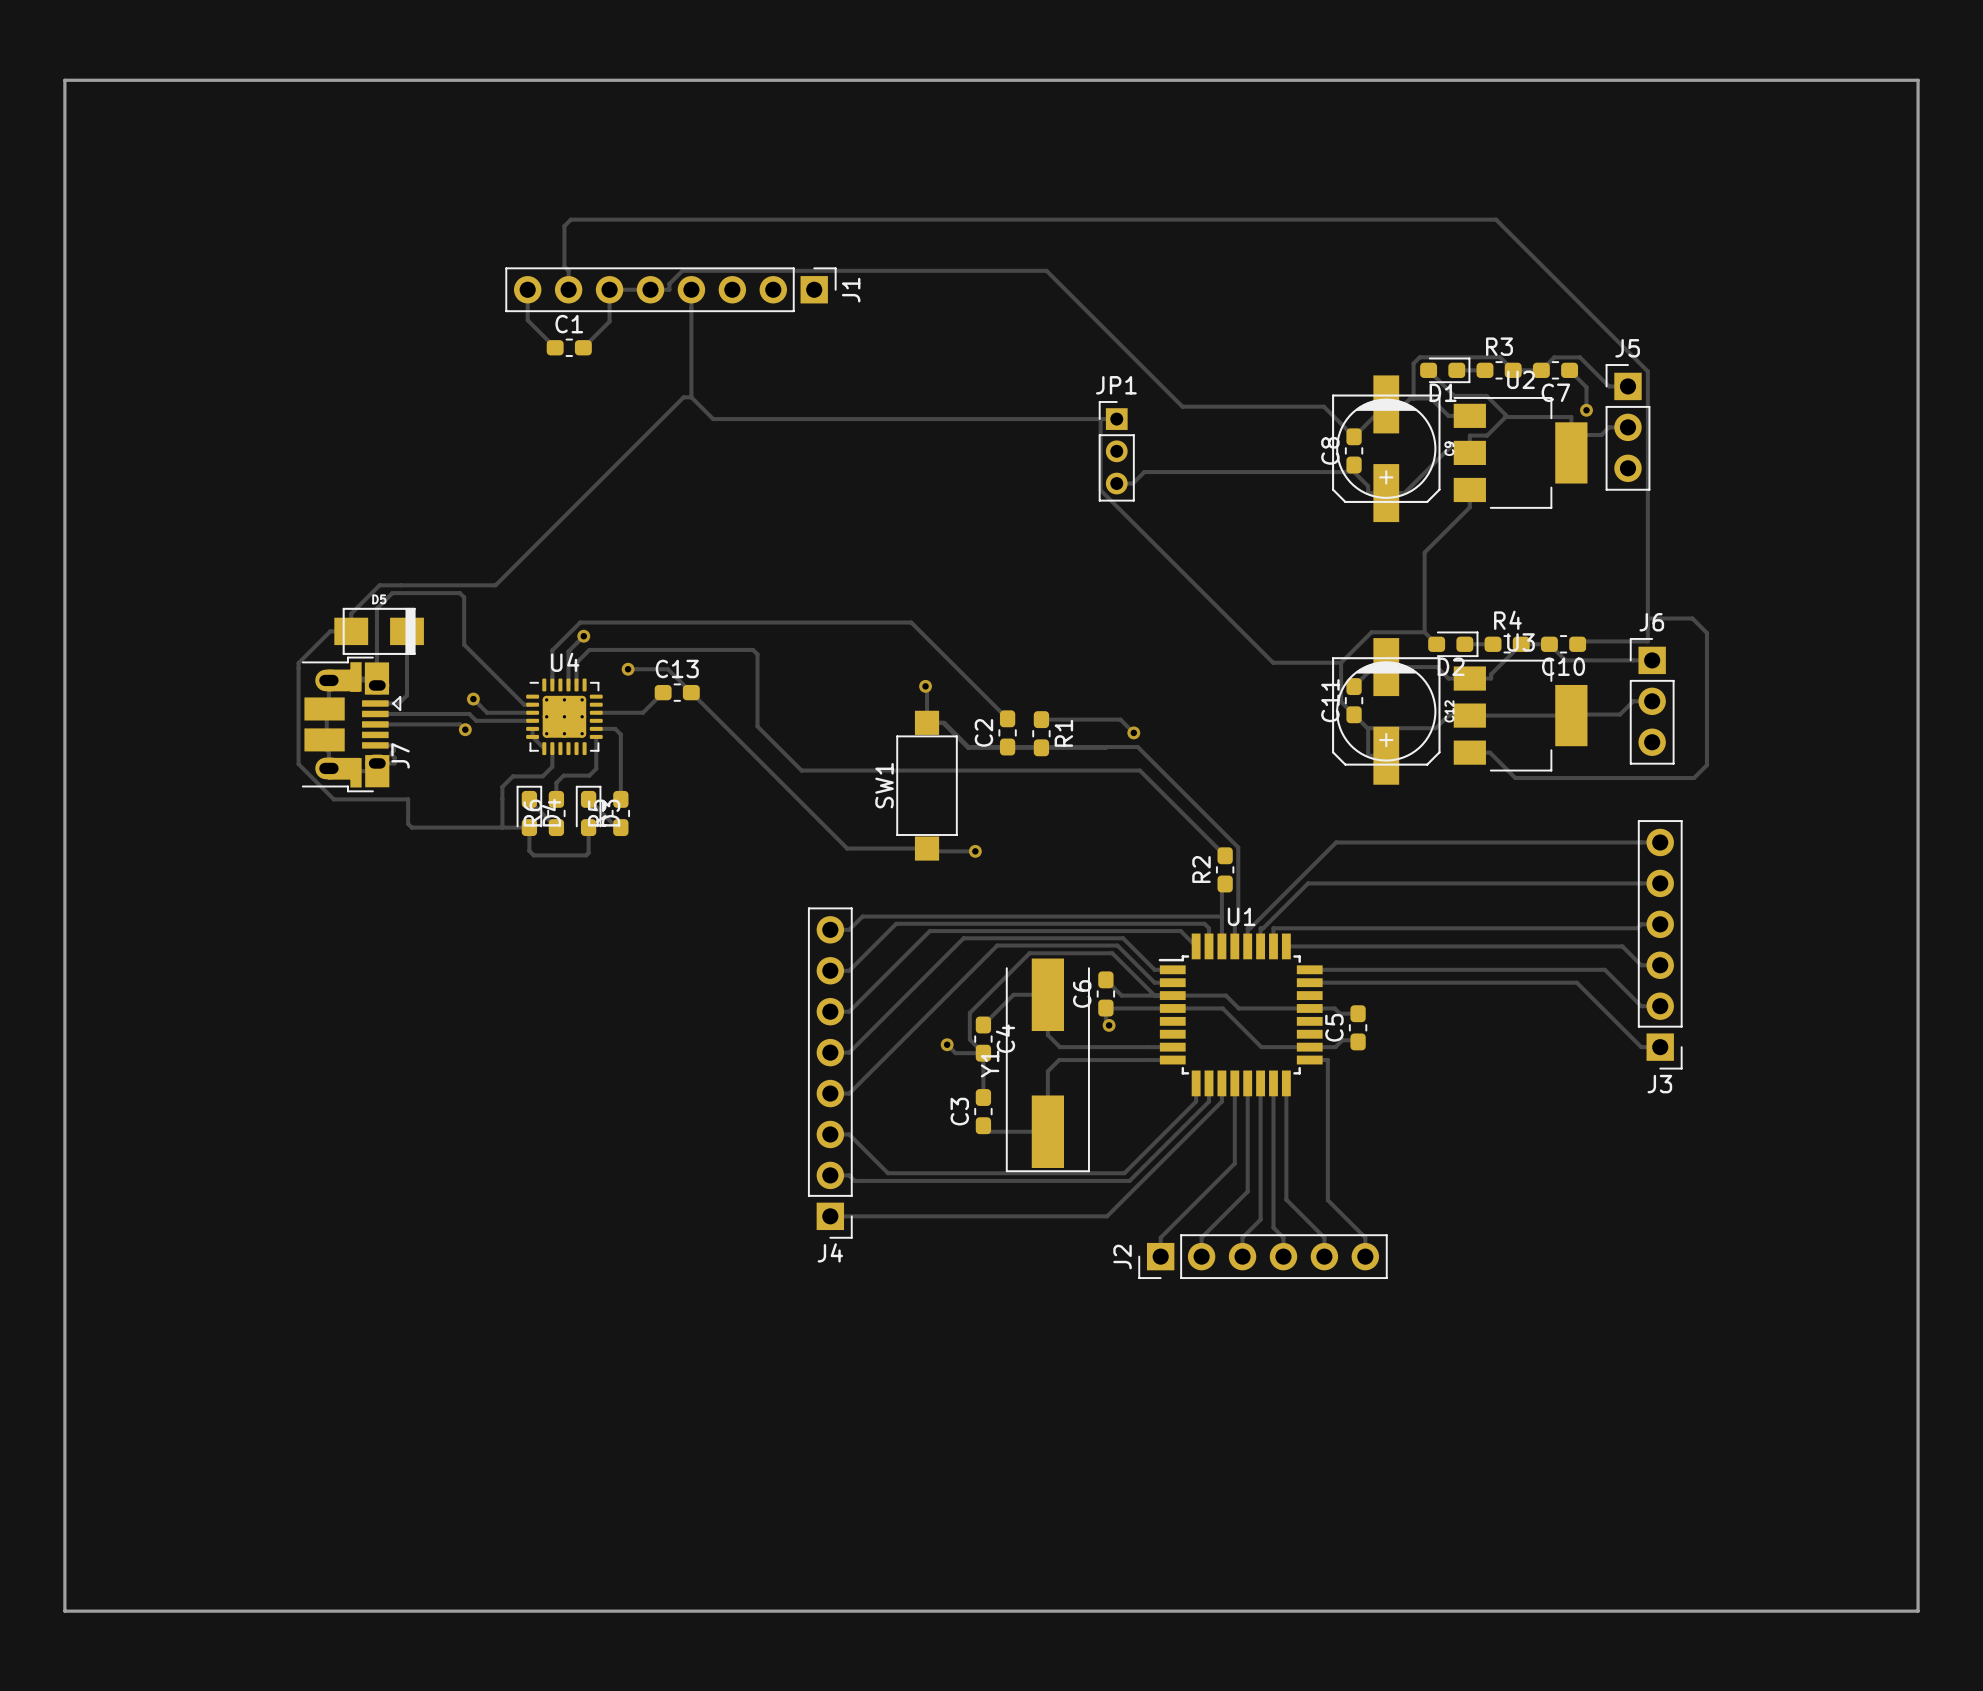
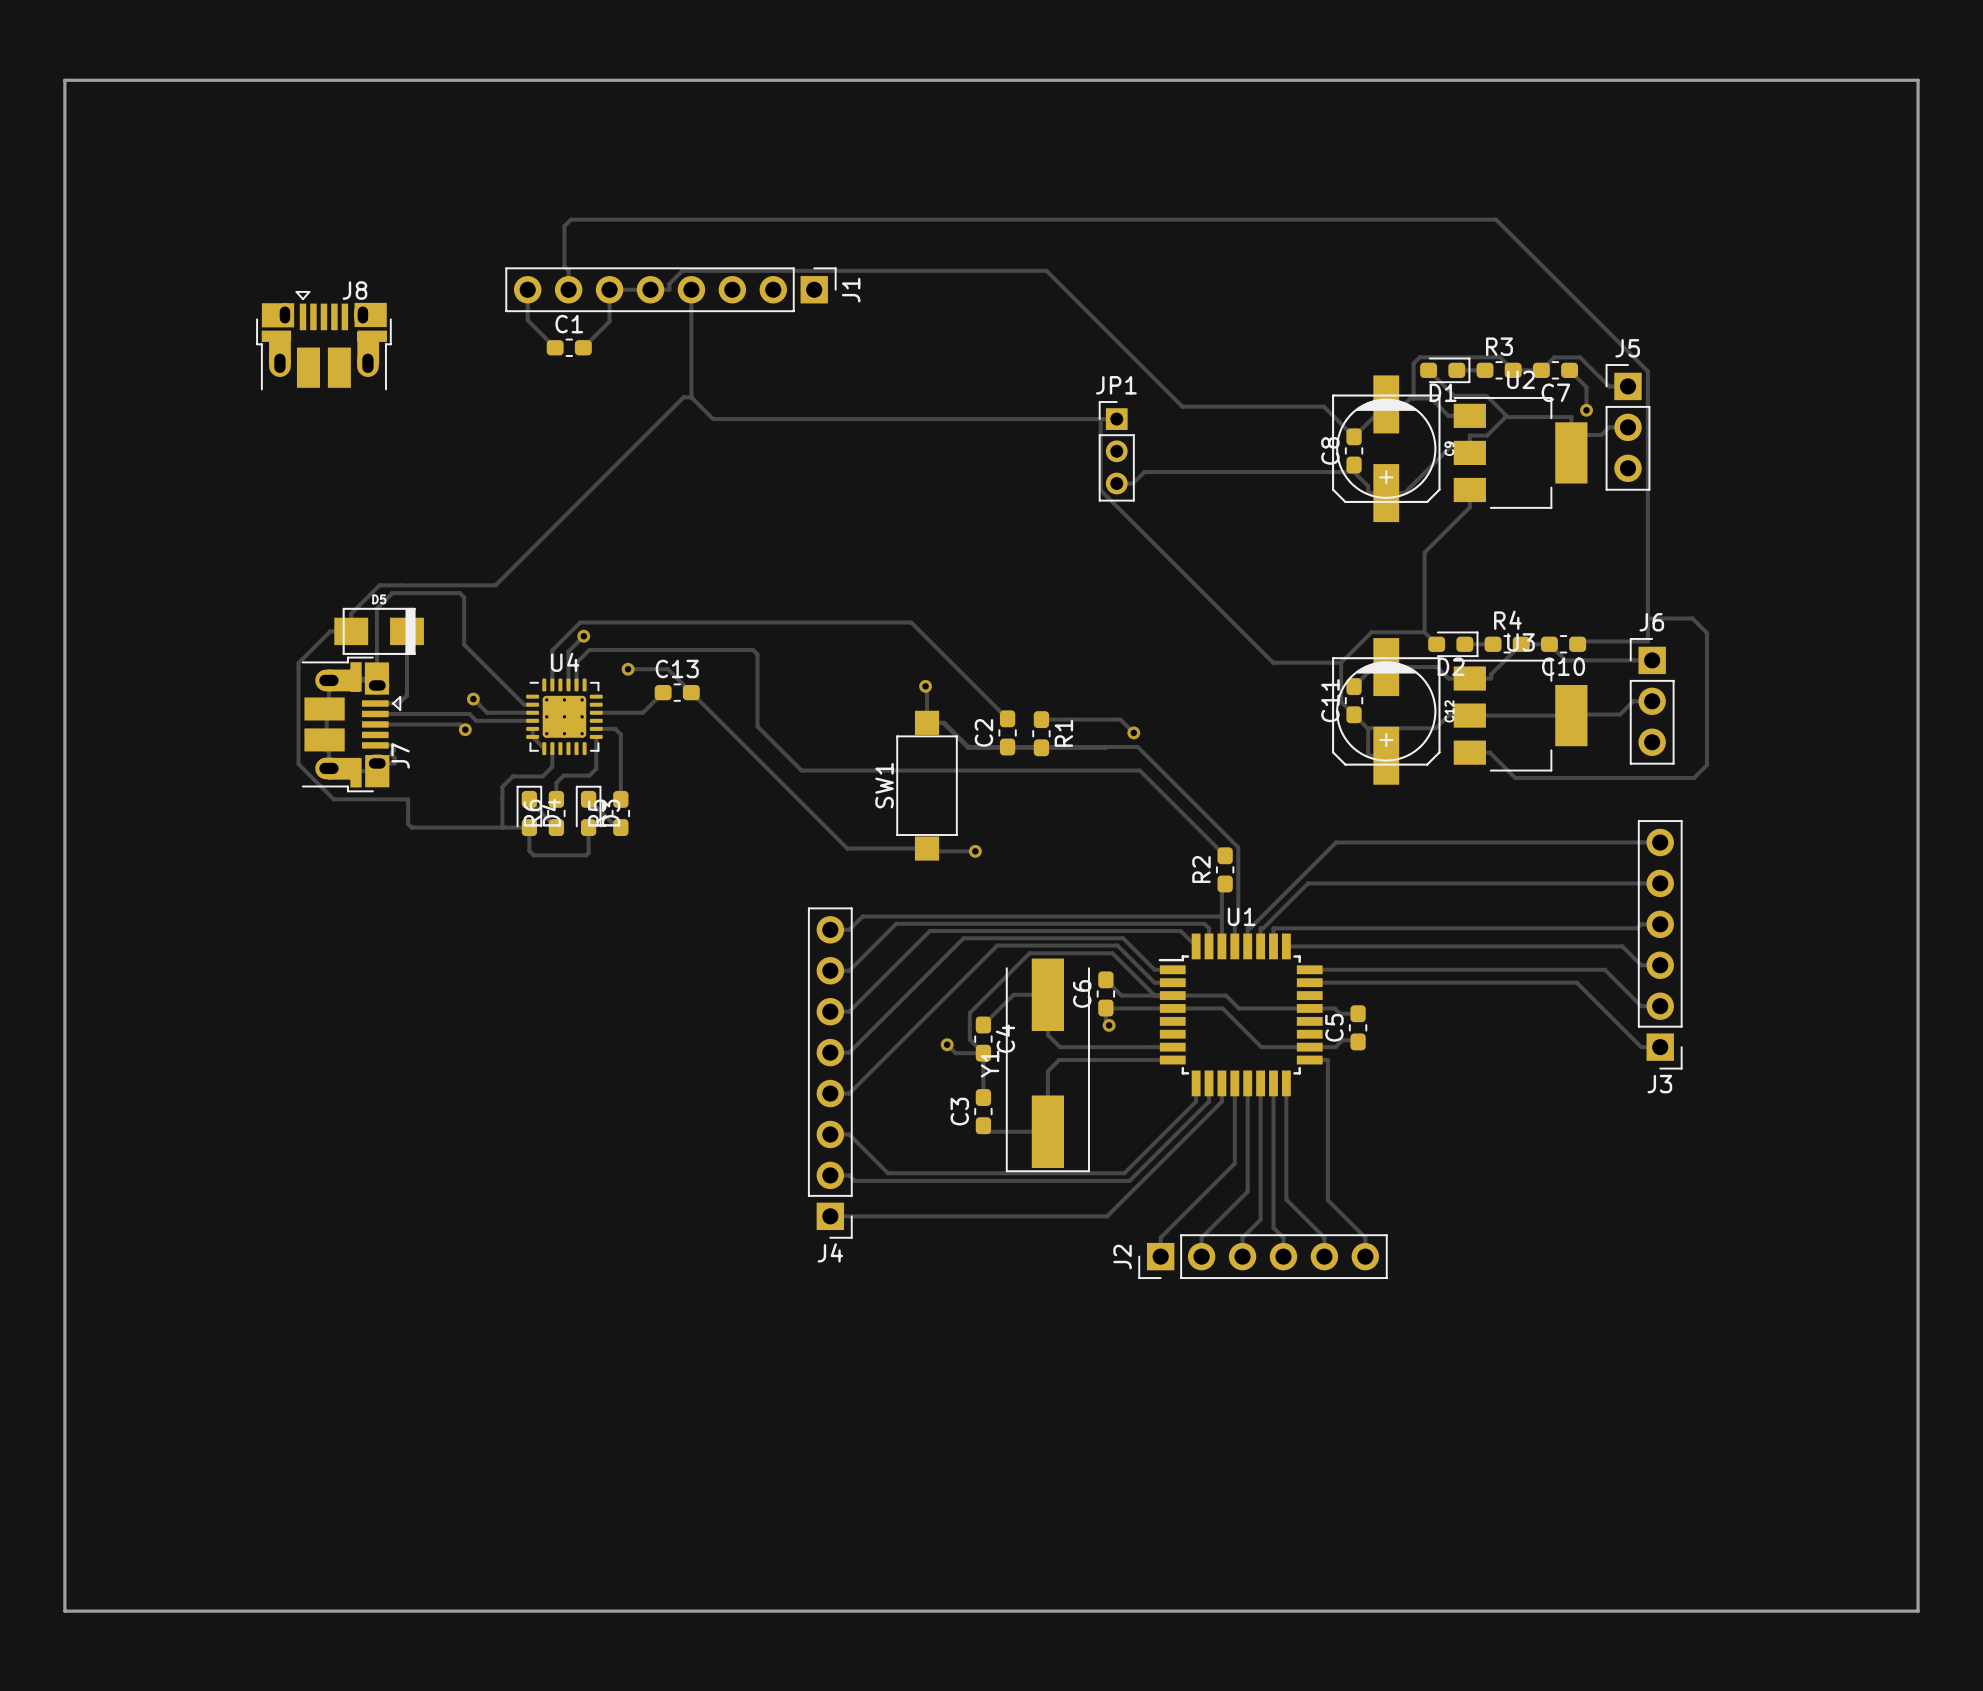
J8: none -> (323, 340)

